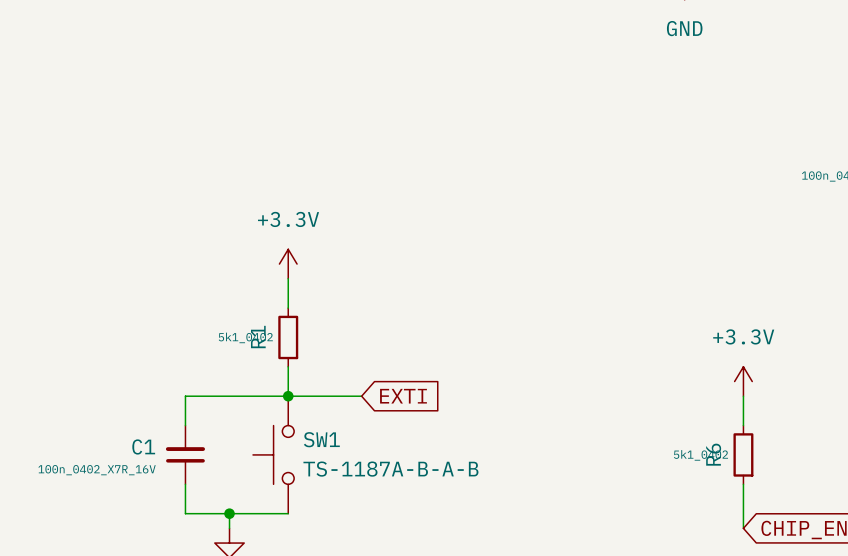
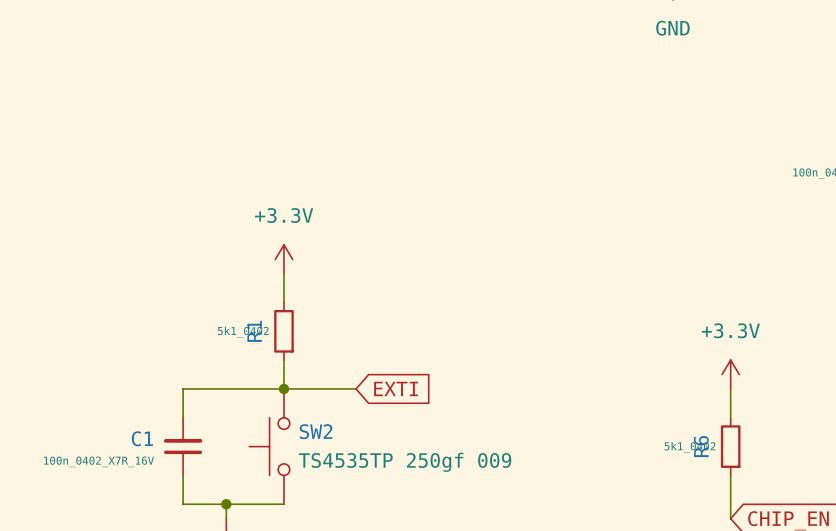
SW1 name: SW1 (321, 439) -> SW2 (316, 431)
SW1 value: TS-1187A-B-A-B (390, 469) -> TS4535TP 250gf 009 (405, 462)

